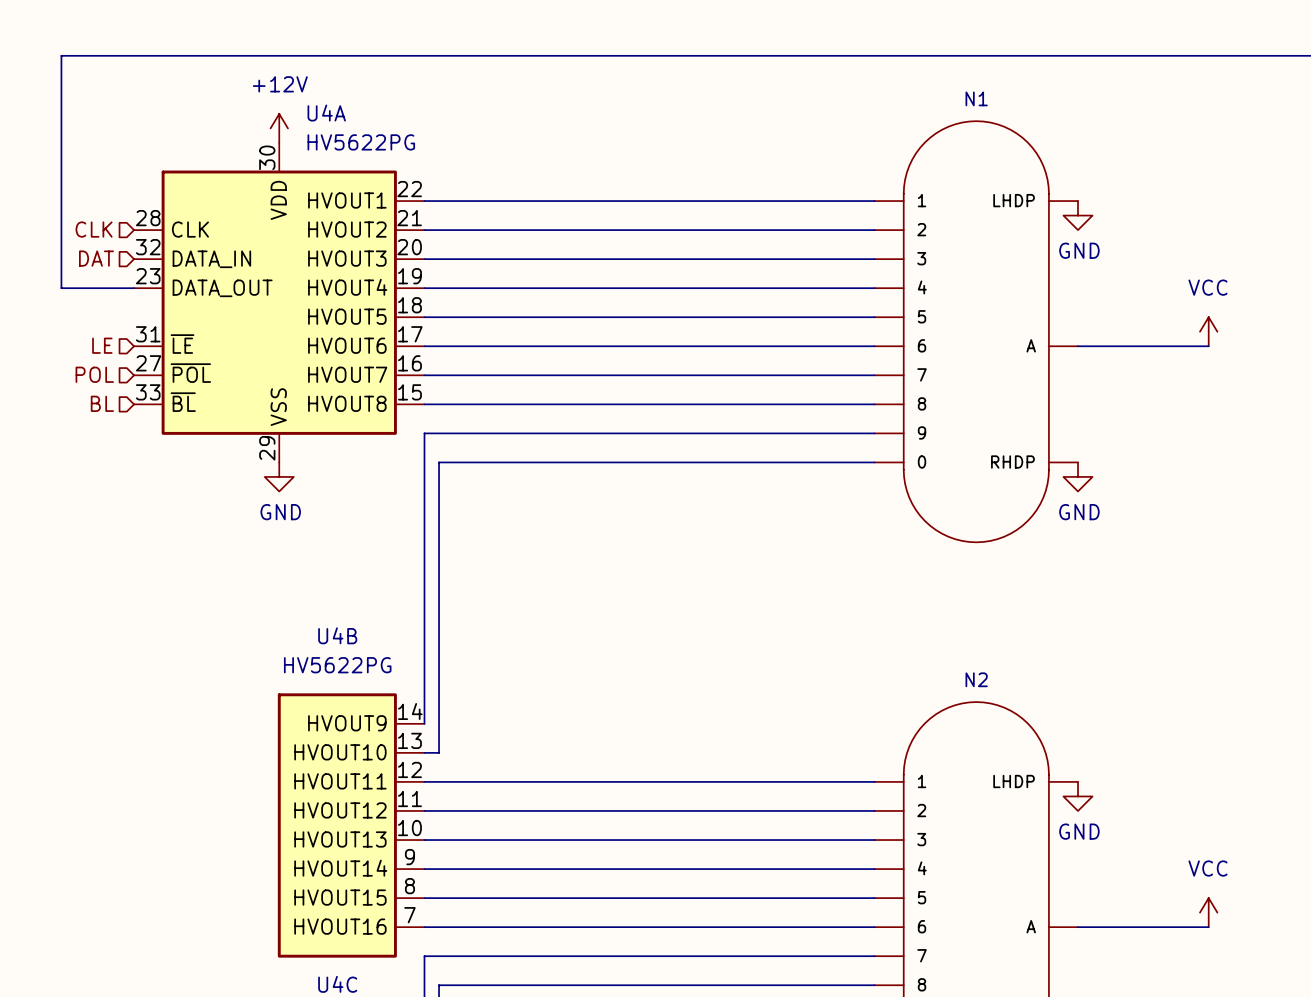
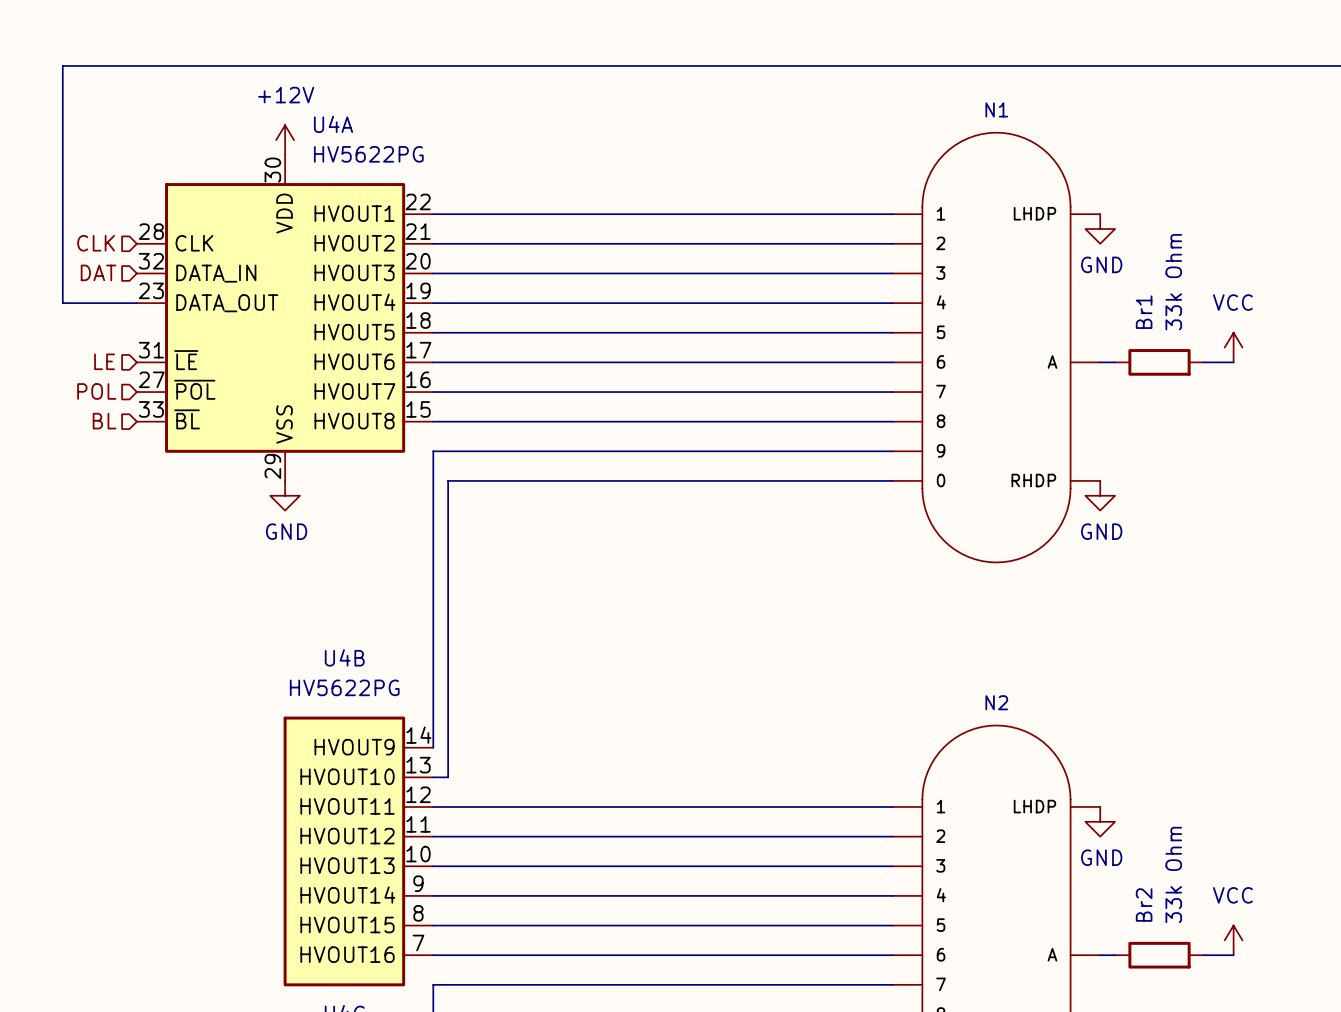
wire: (1092, 346) (1179, 346) -> none
Br1: none -> 33k Ohm (1159, 362)
wire: (1092, 927) (1179, 927) -> none
Br2: none -> 33k Ohm (1159, 955)

